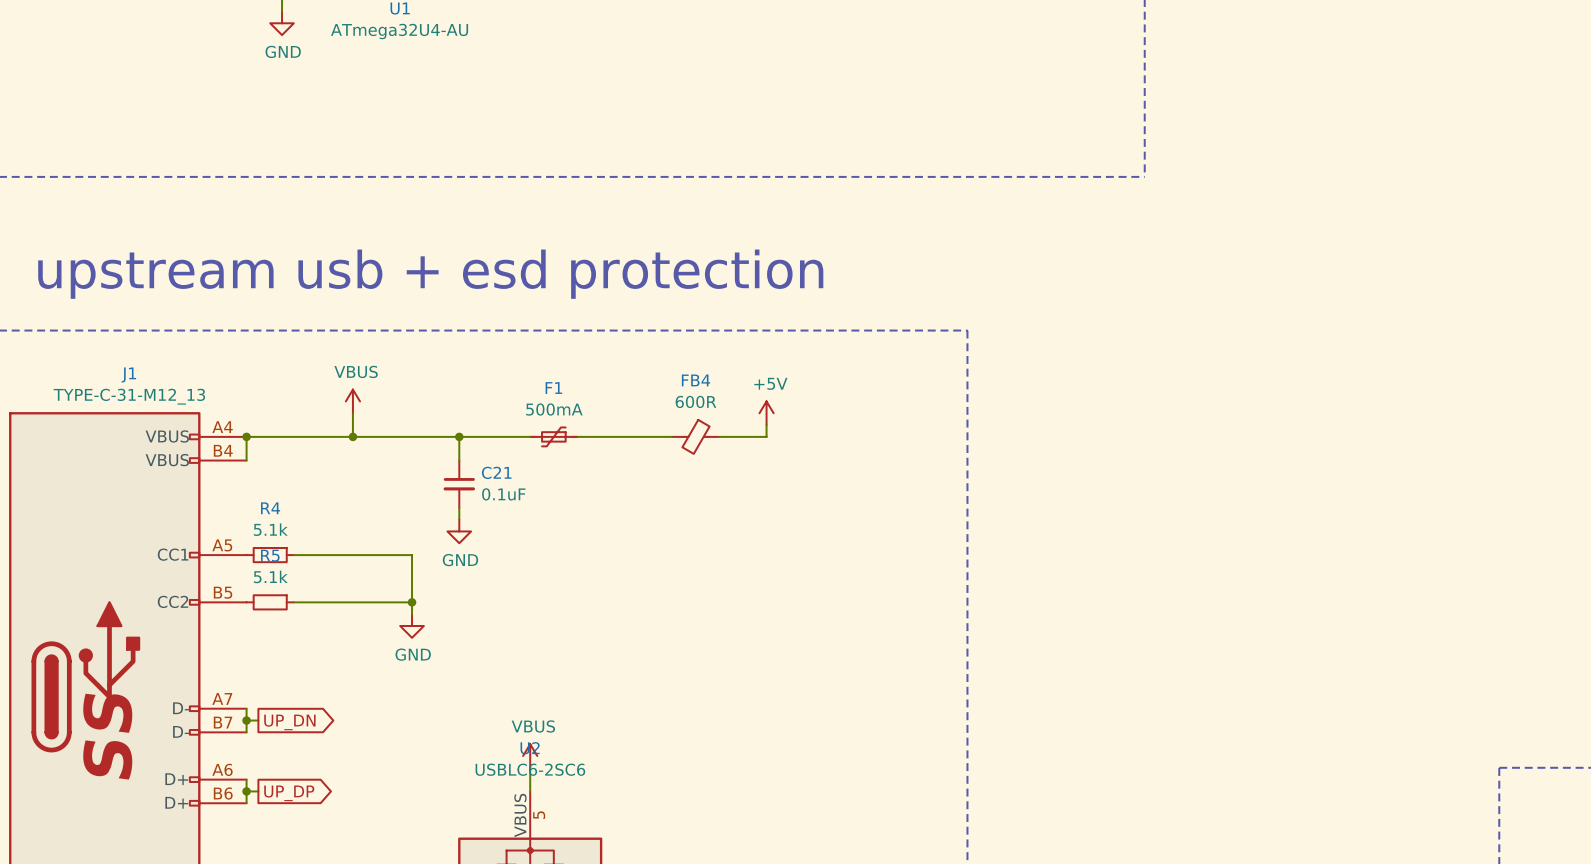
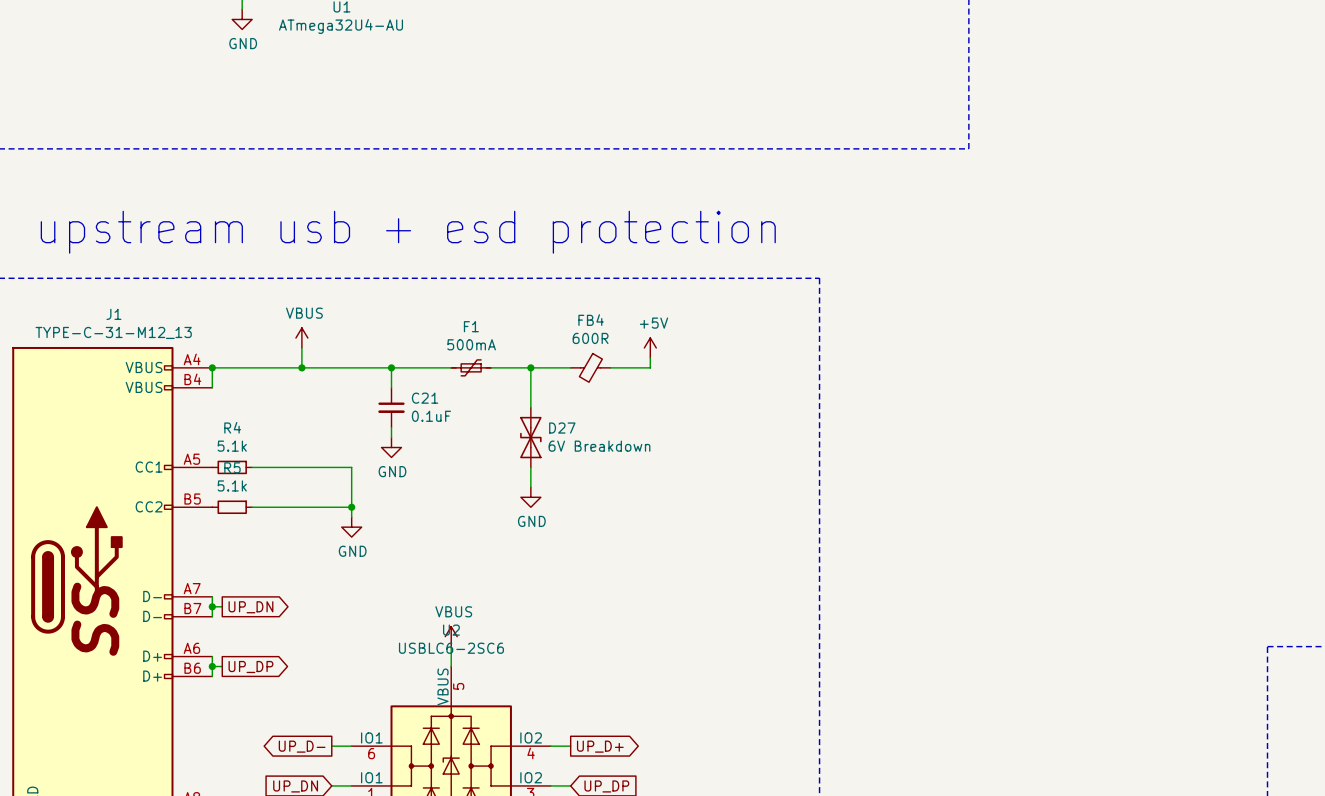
wire: none -> (530, 367) (530, 407)
junction: none -> (530, 367)
D27: none -> 6V Breakdown (530, 437)
wire: none -> (530, 467) (530, 487)
power symbol: none -> GND (530, 497)

